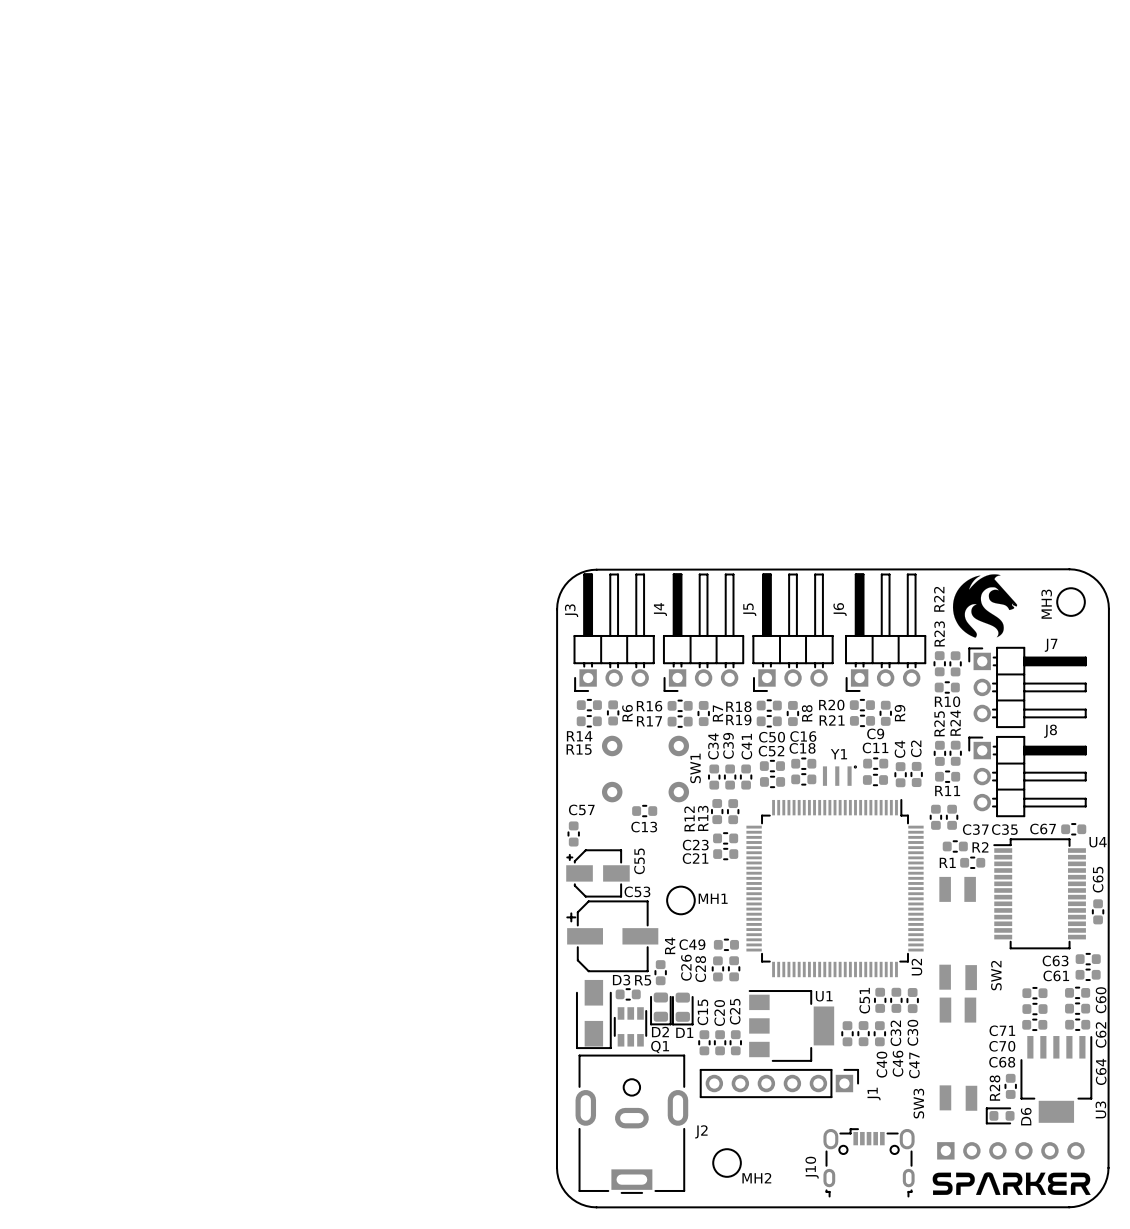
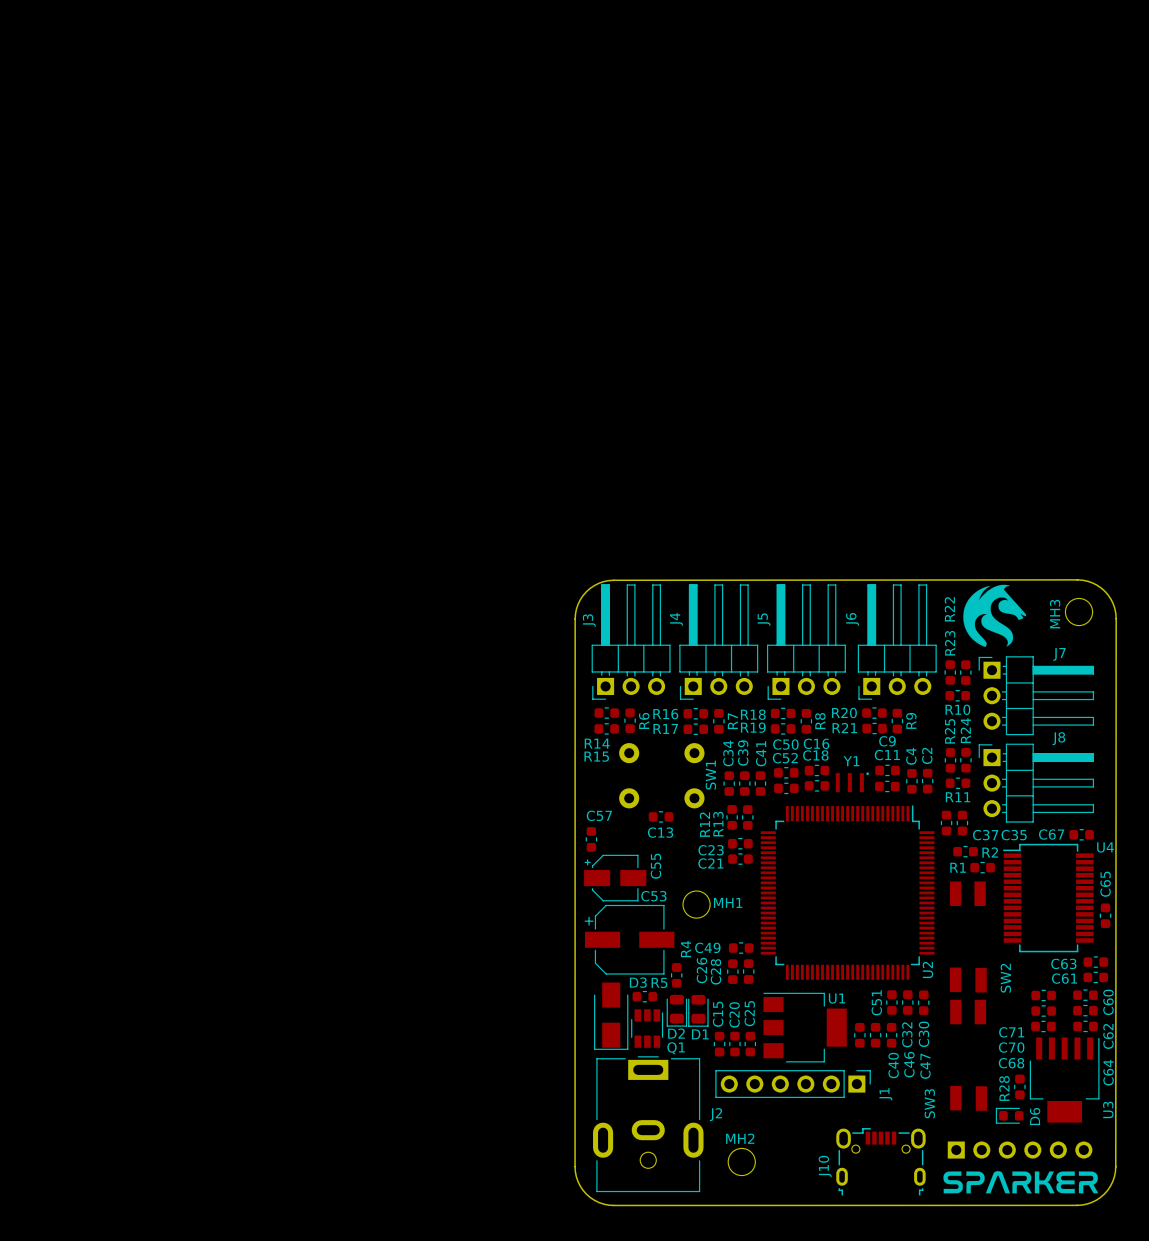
J2 rotation: 0° (631, 1124) -> 180° (648, 1124)
MH2 name position: MH2 (756, 1178) -> MH2 (740, 1138)

